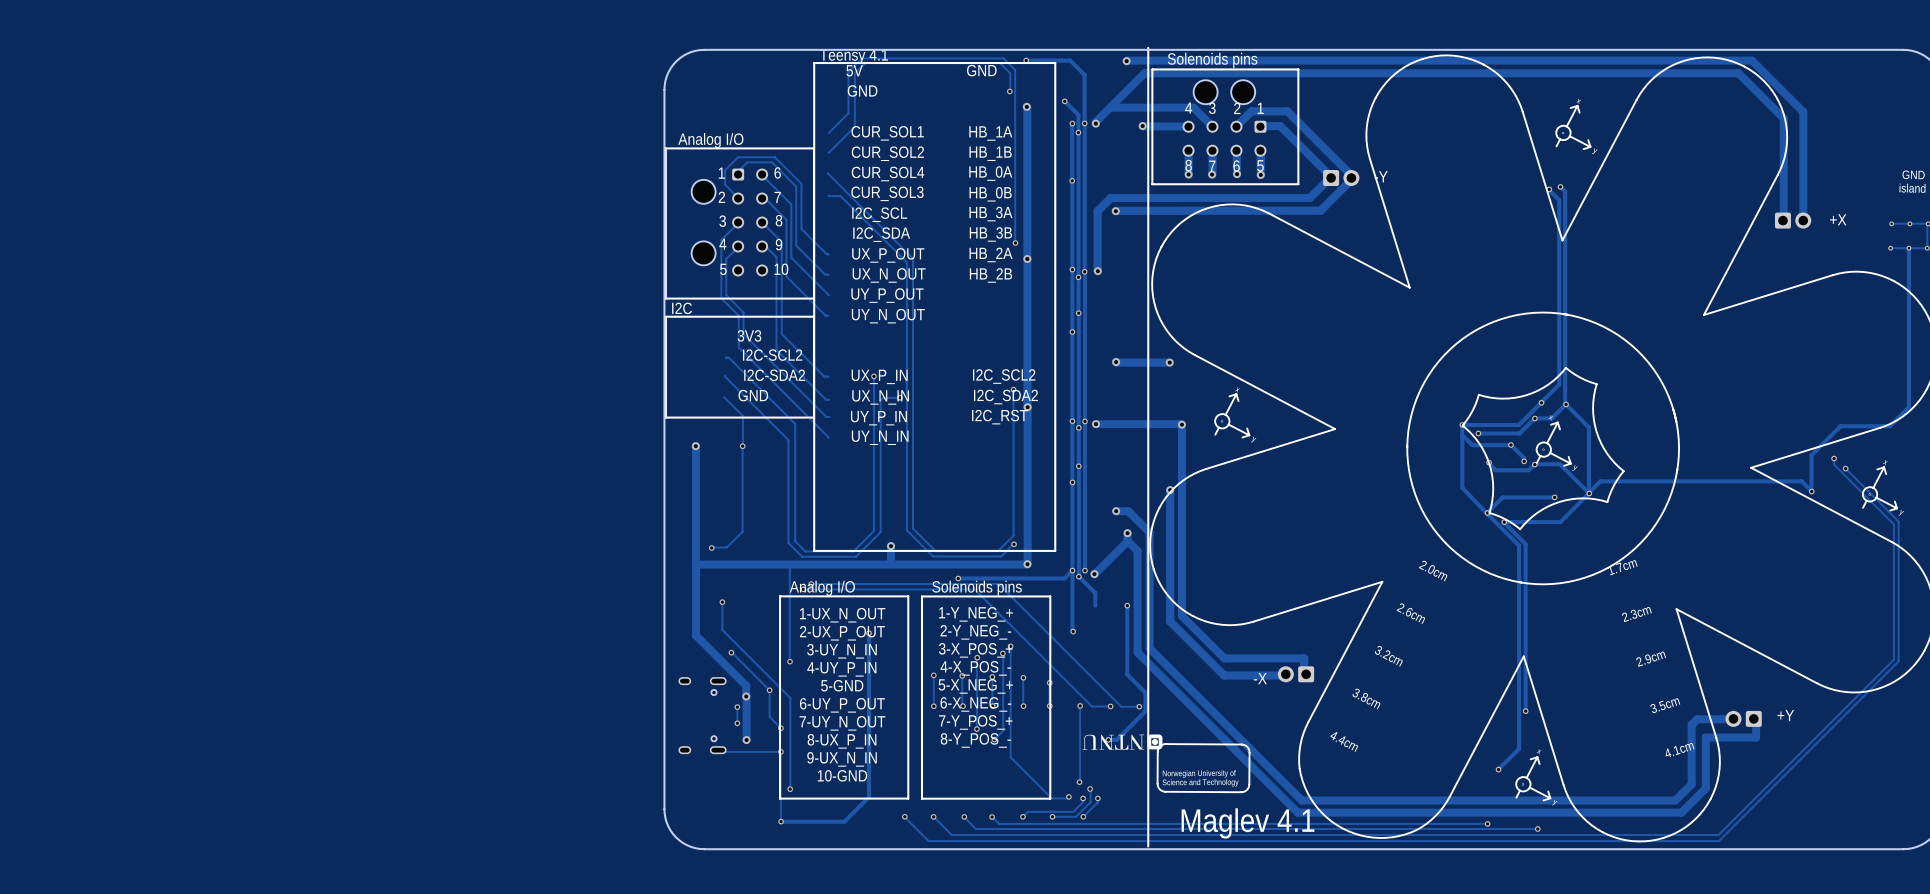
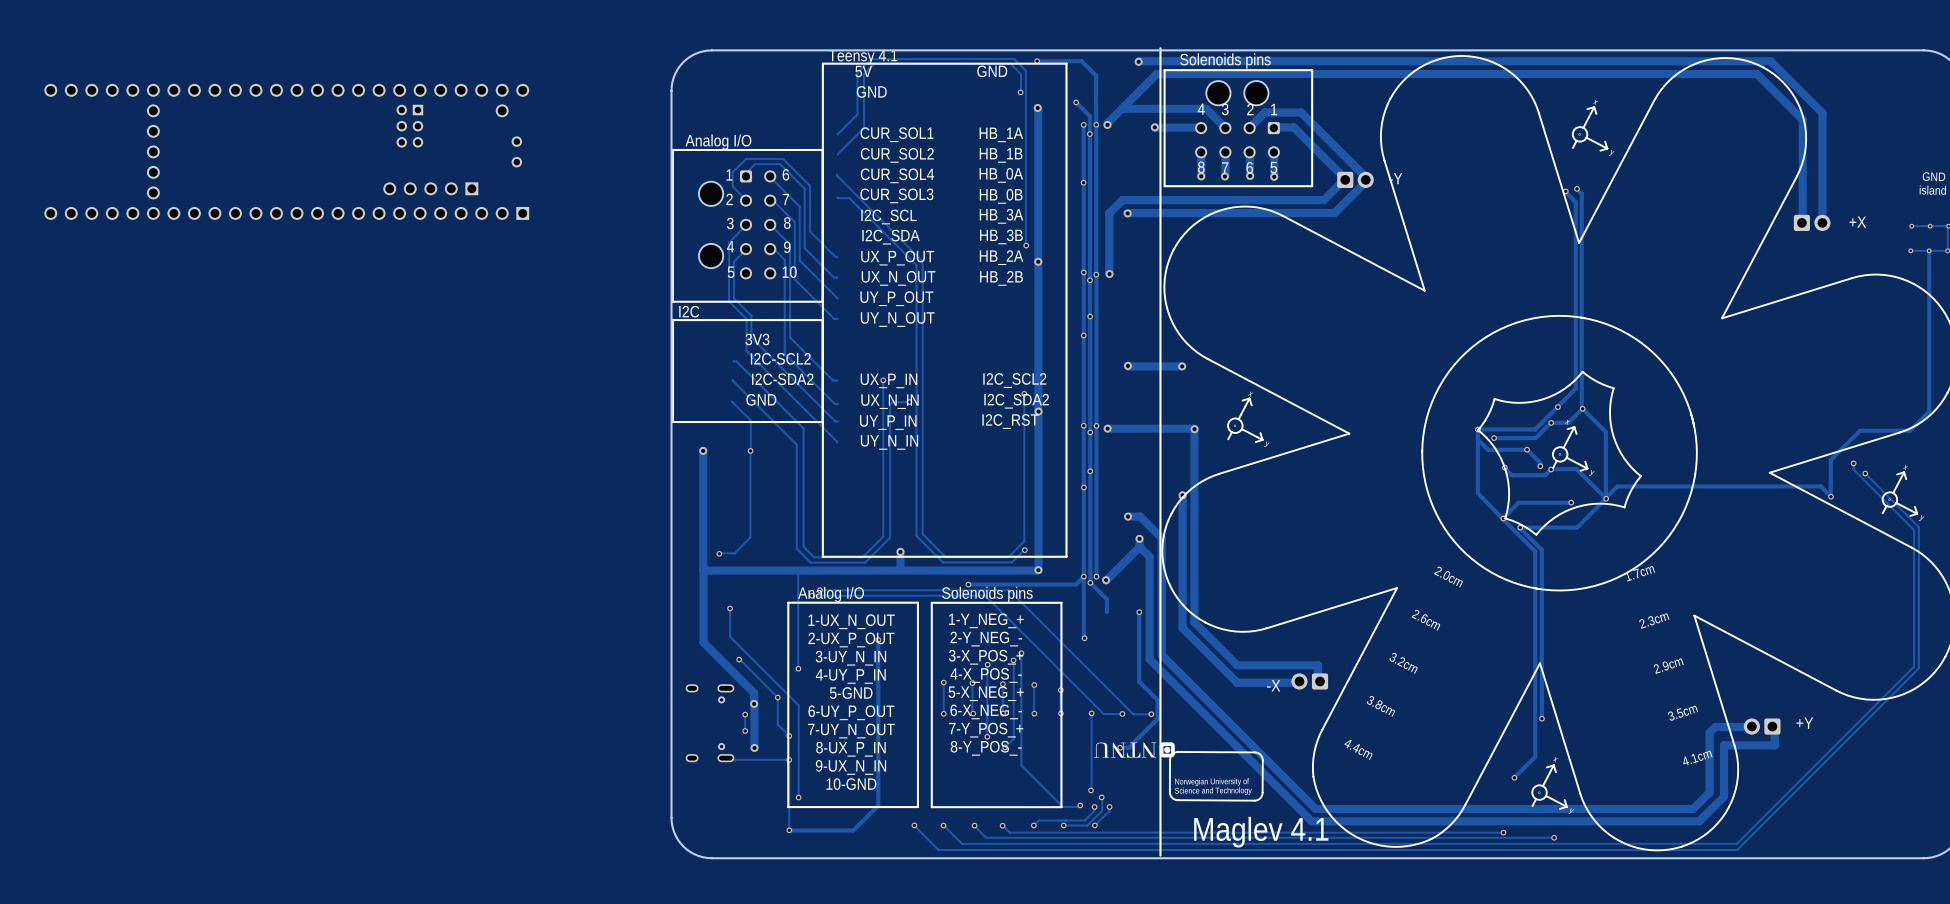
part: none -> (286, 151)

